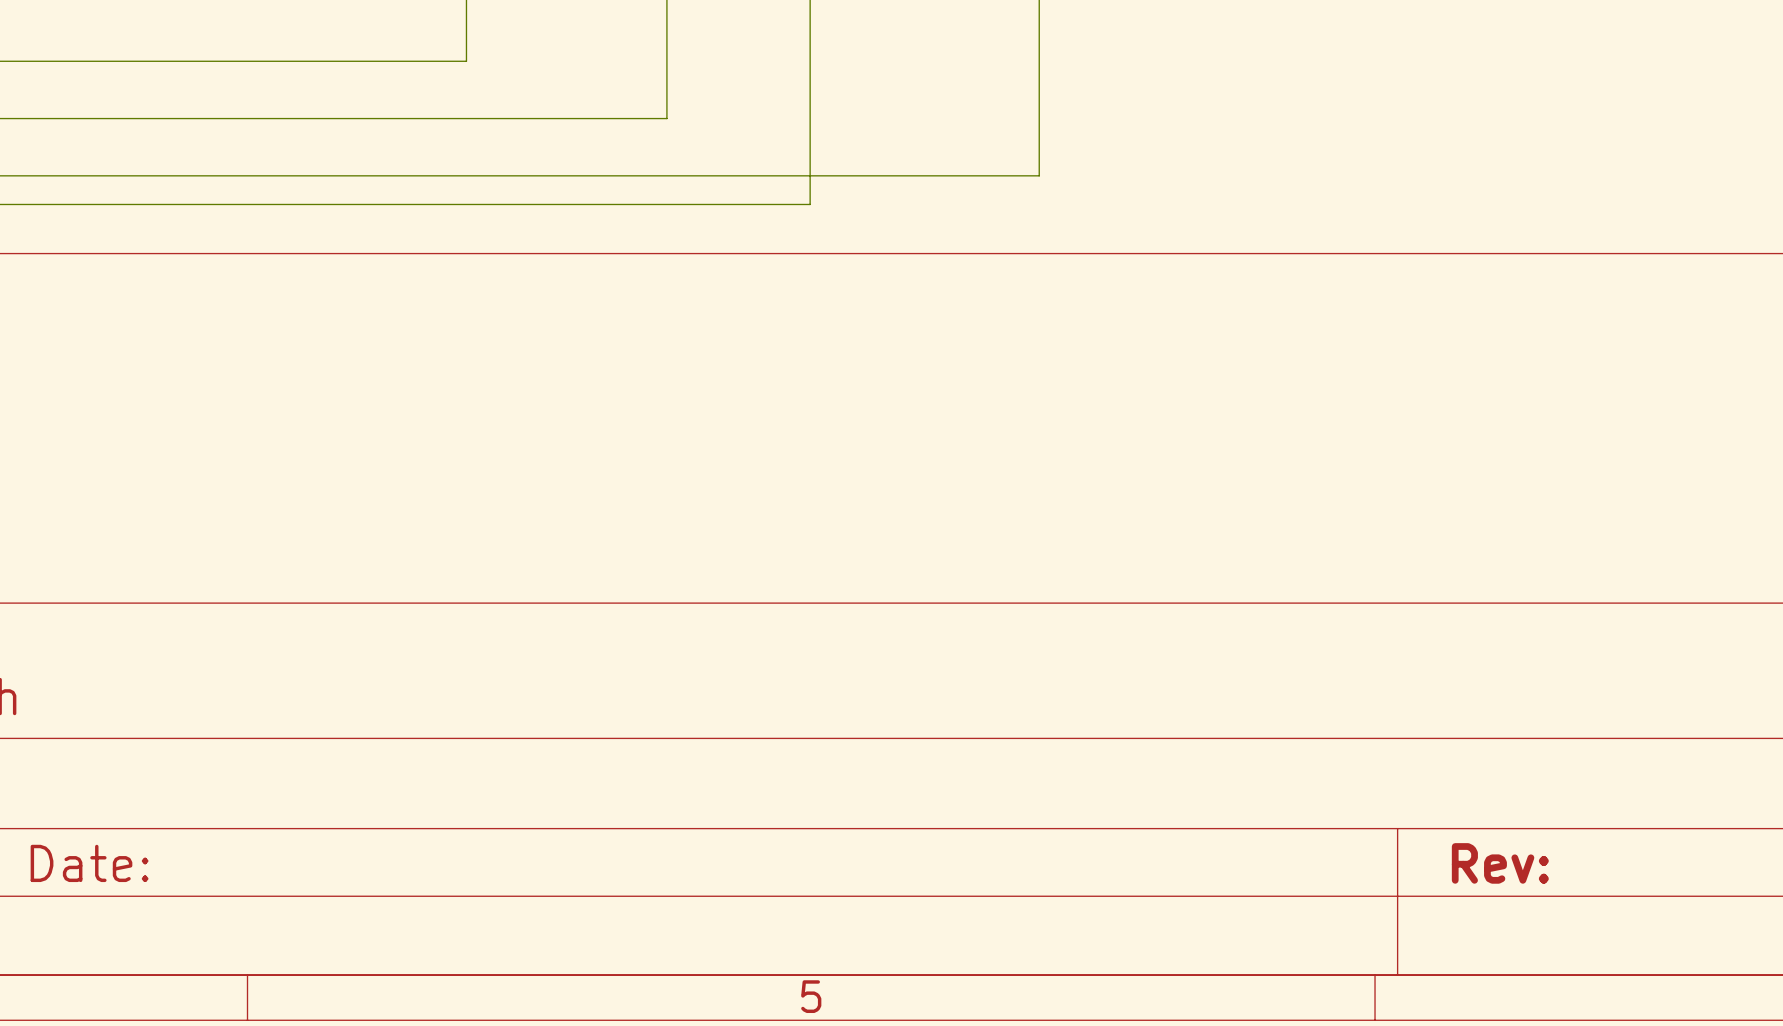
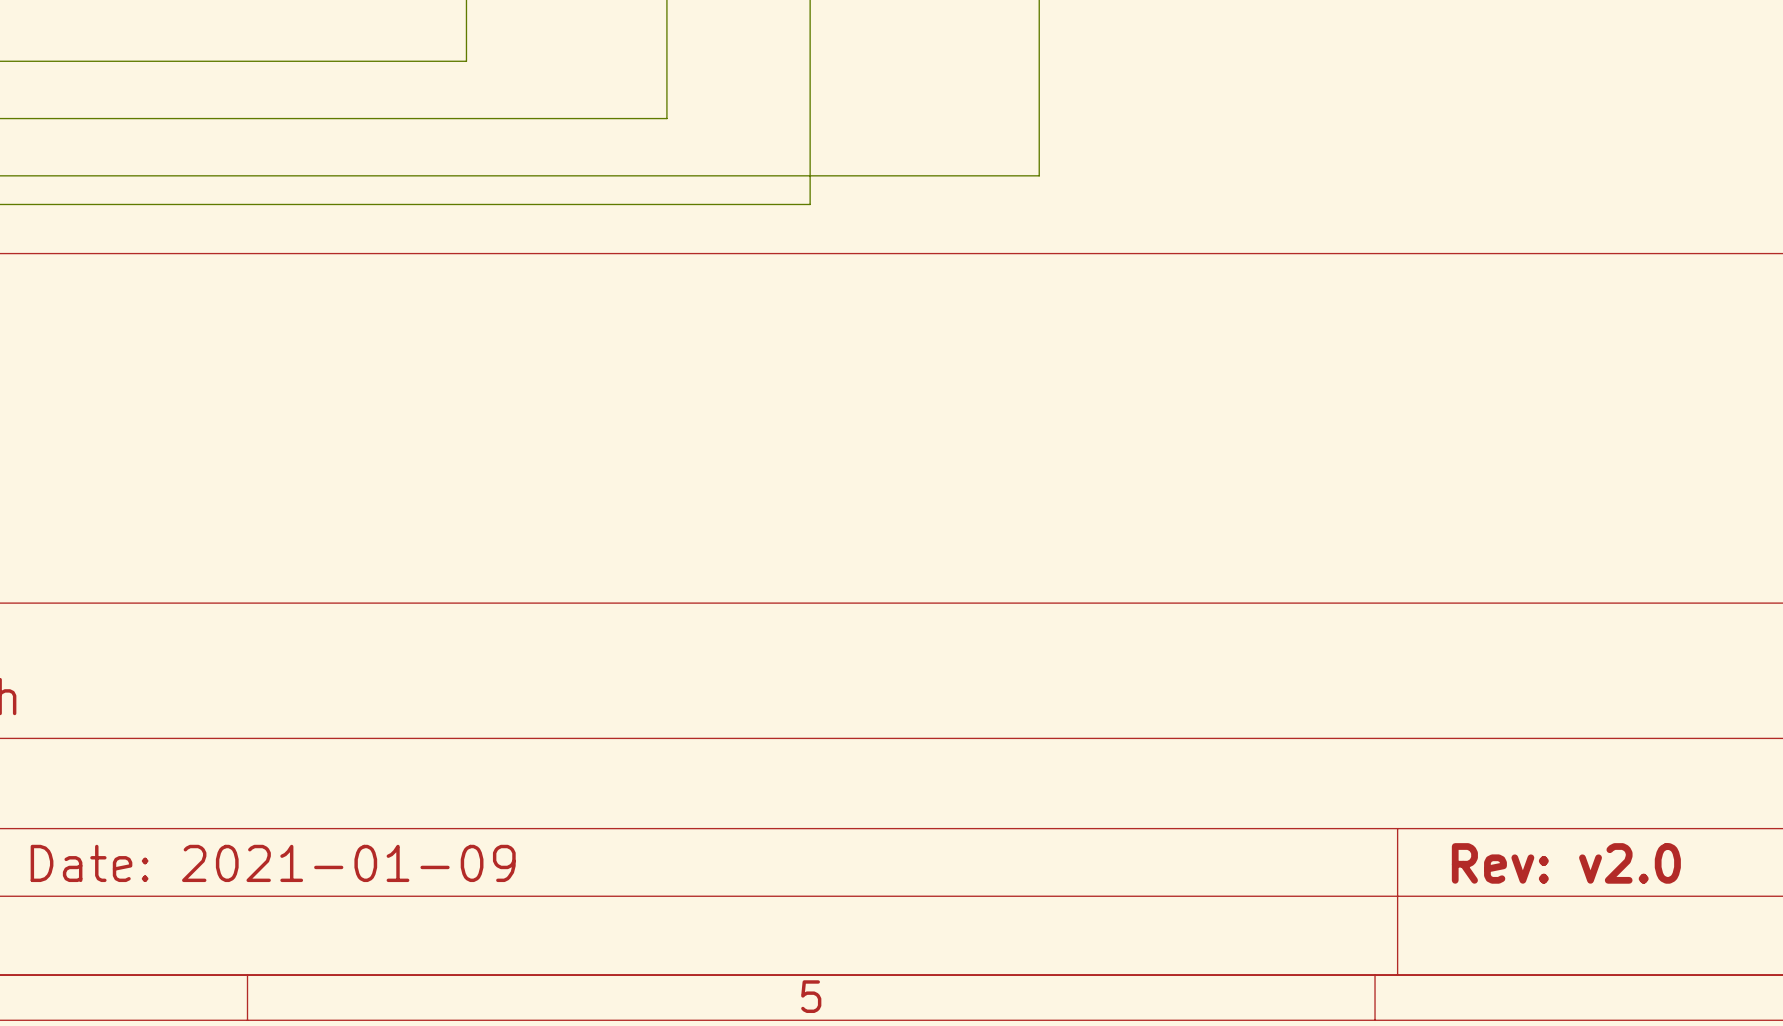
title block: Date: (89, 863) -> Date: 2021-01-09 (273, 863)
title block: Rev: (1500, 863) -> Rev: v2.0 (1566, 863)

